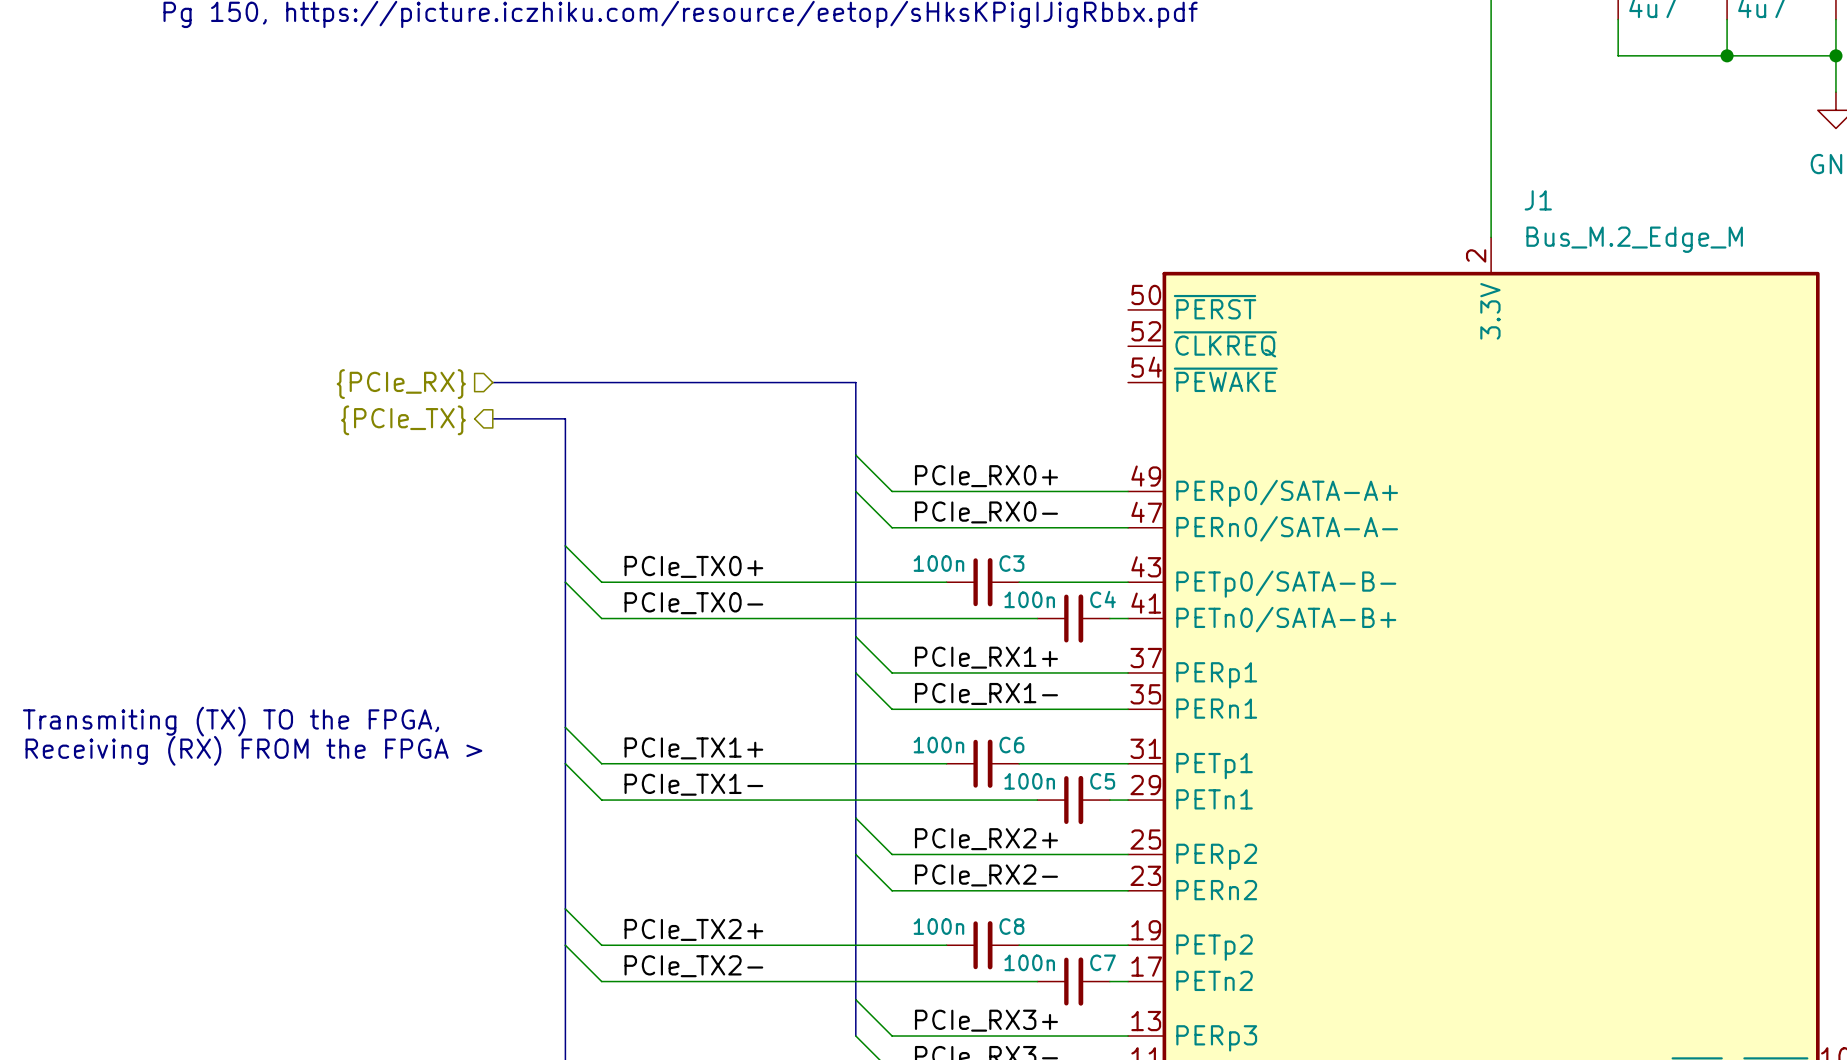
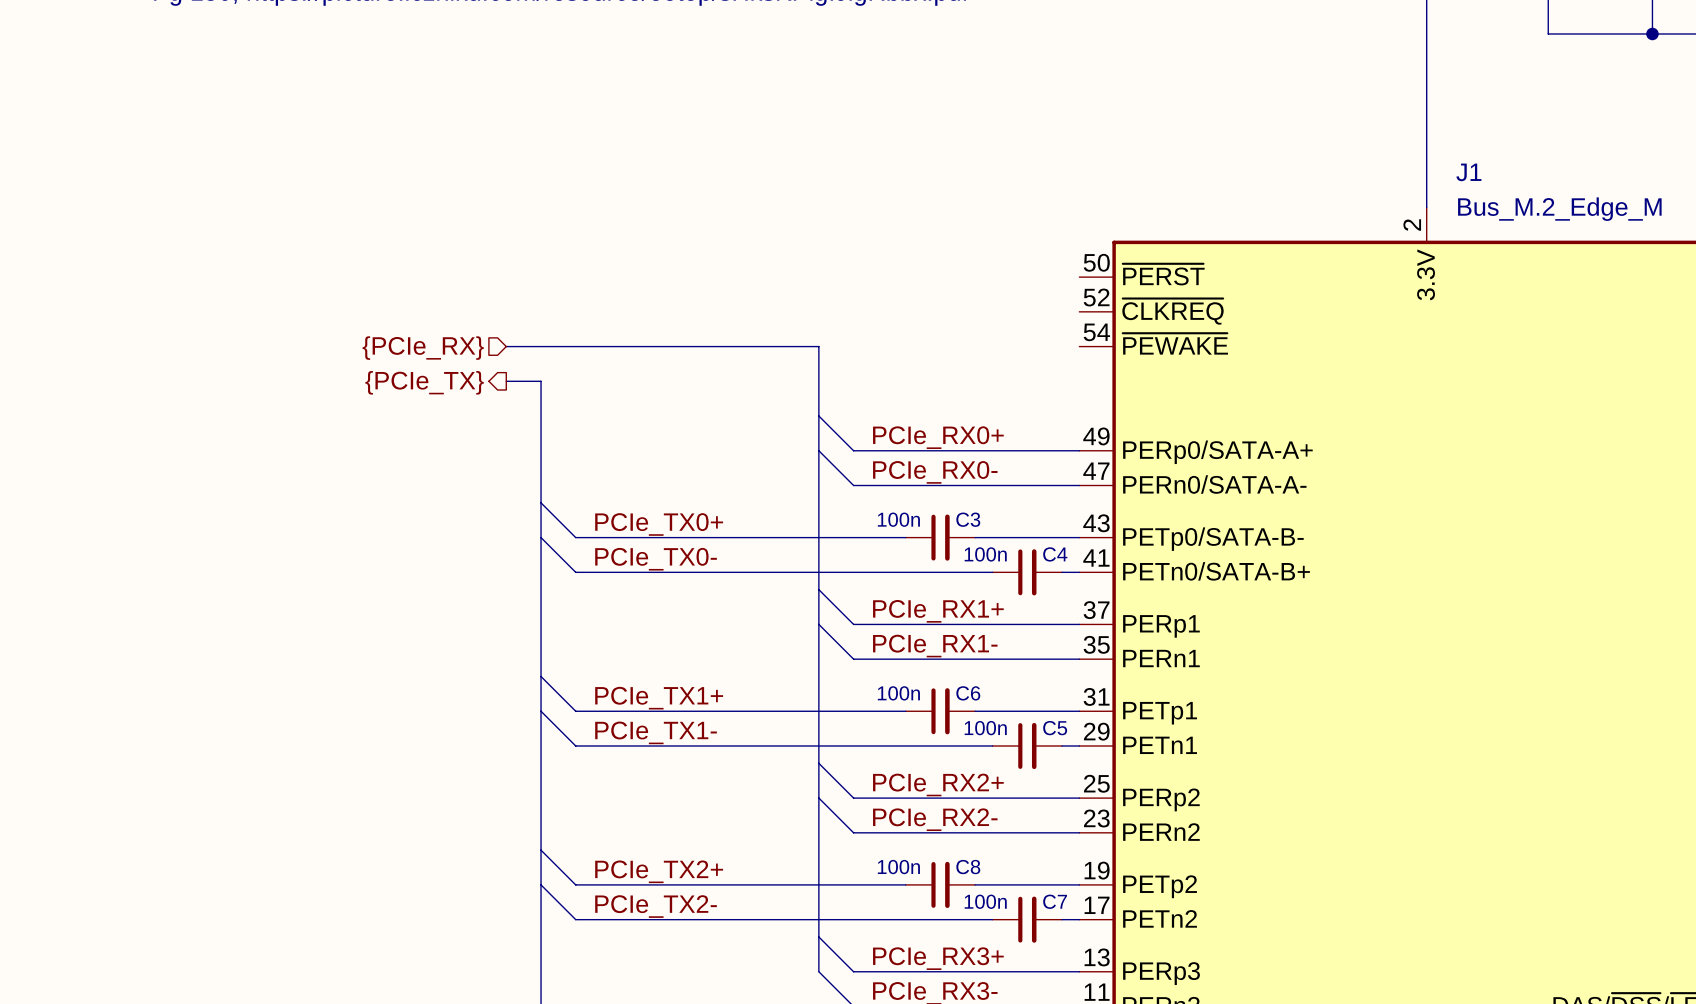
bus: (492, 382) (529, 382) -> none
hierarchical label position: {PCIe_RX} (401, 384) -> {PCIe_RX} (423, 348)
bus: (492, 418) (529, 418) -> none
hierarchical label position: {PCIe_TX} (403, 420) -> {PCIe_TX} (424, 382)
text: Transmiting (TX) TO the FPGA, (231, 721) -> none
text: Receiving (RX) FROM the FPGA > (253, 750) -> none

